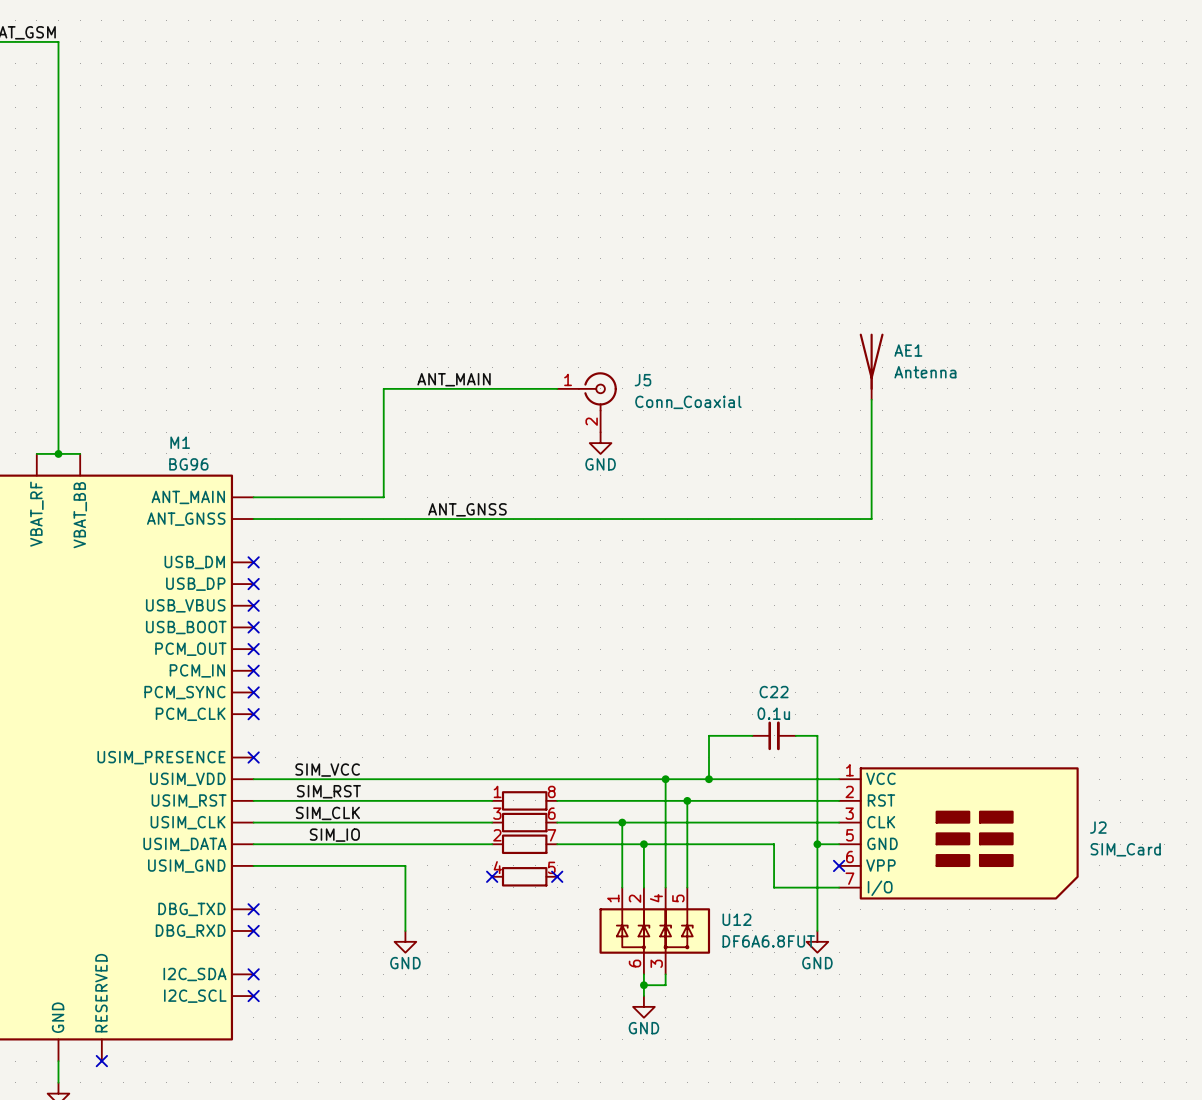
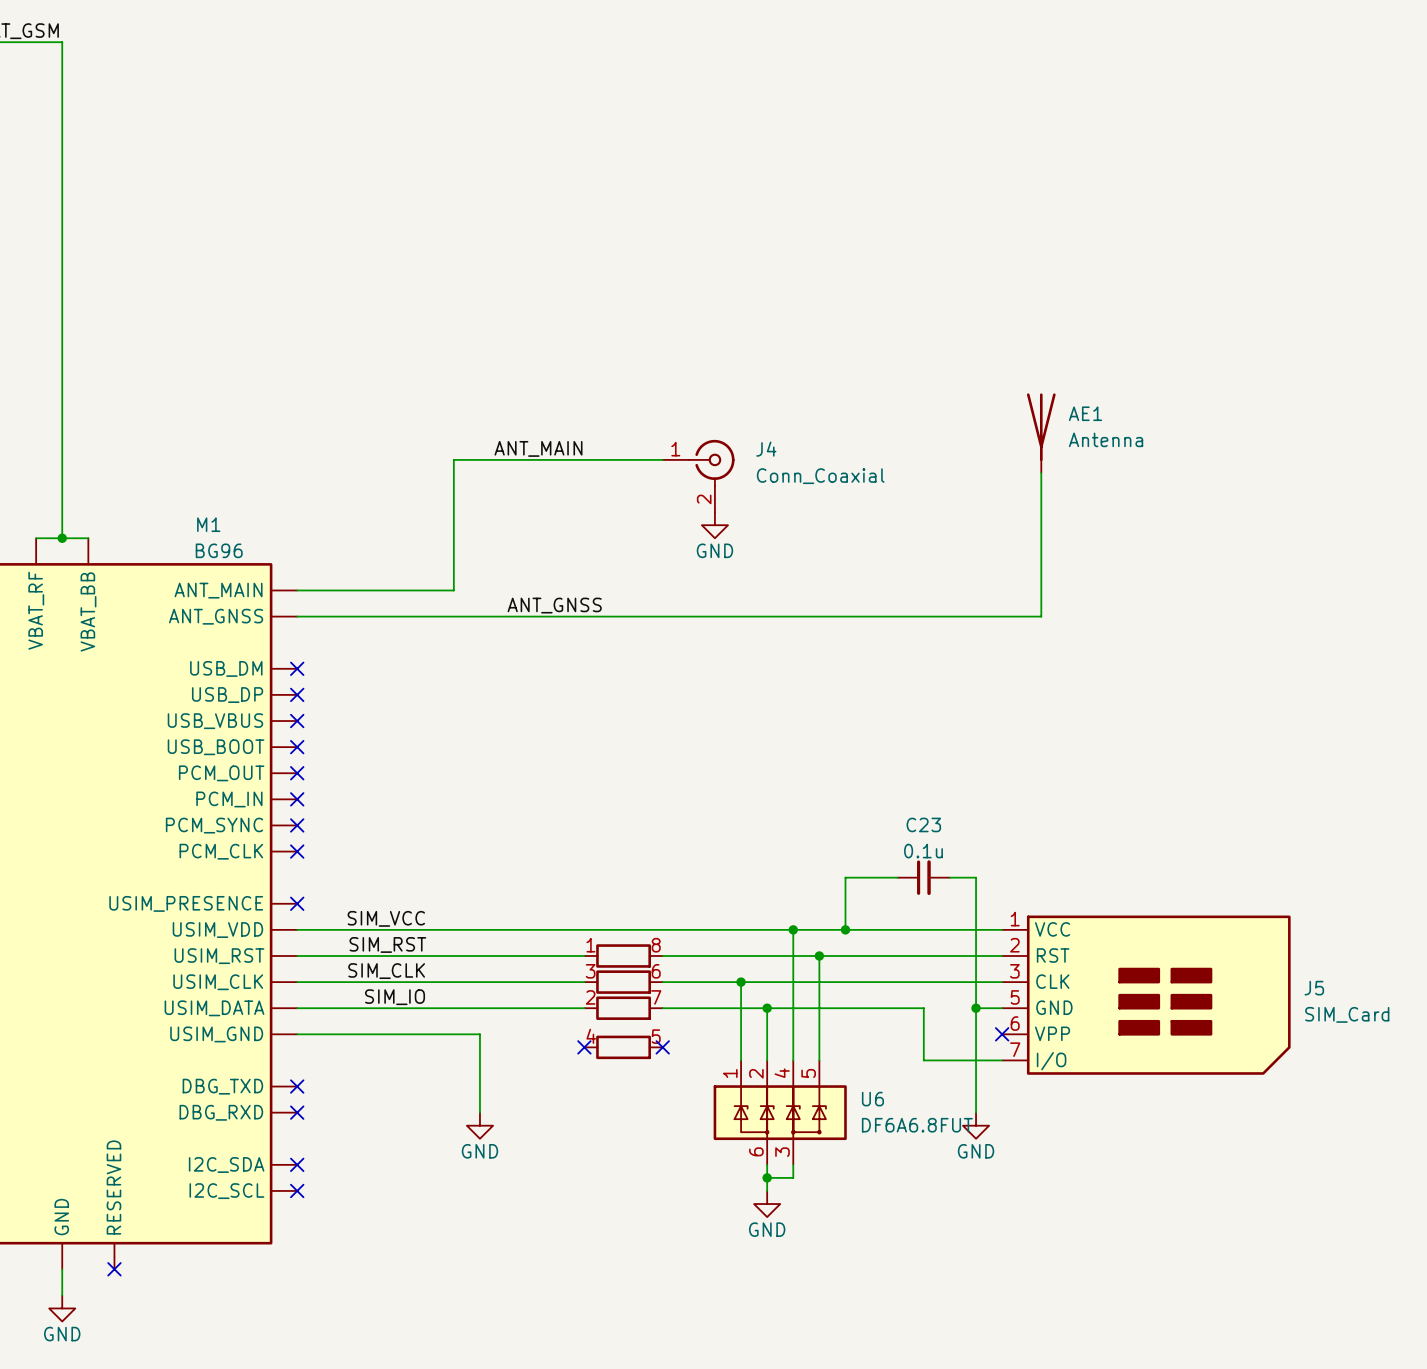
J5 name: J5 (642, 380) -> J4 (766, 449)
C22 name: C22 (774, 692) -> C23 (923, 824)
J2 name: J2 (1098, 827) -> J5 (1314, 988)
U12 name: U12 (736, 919) -> U6 (872, 1099)

